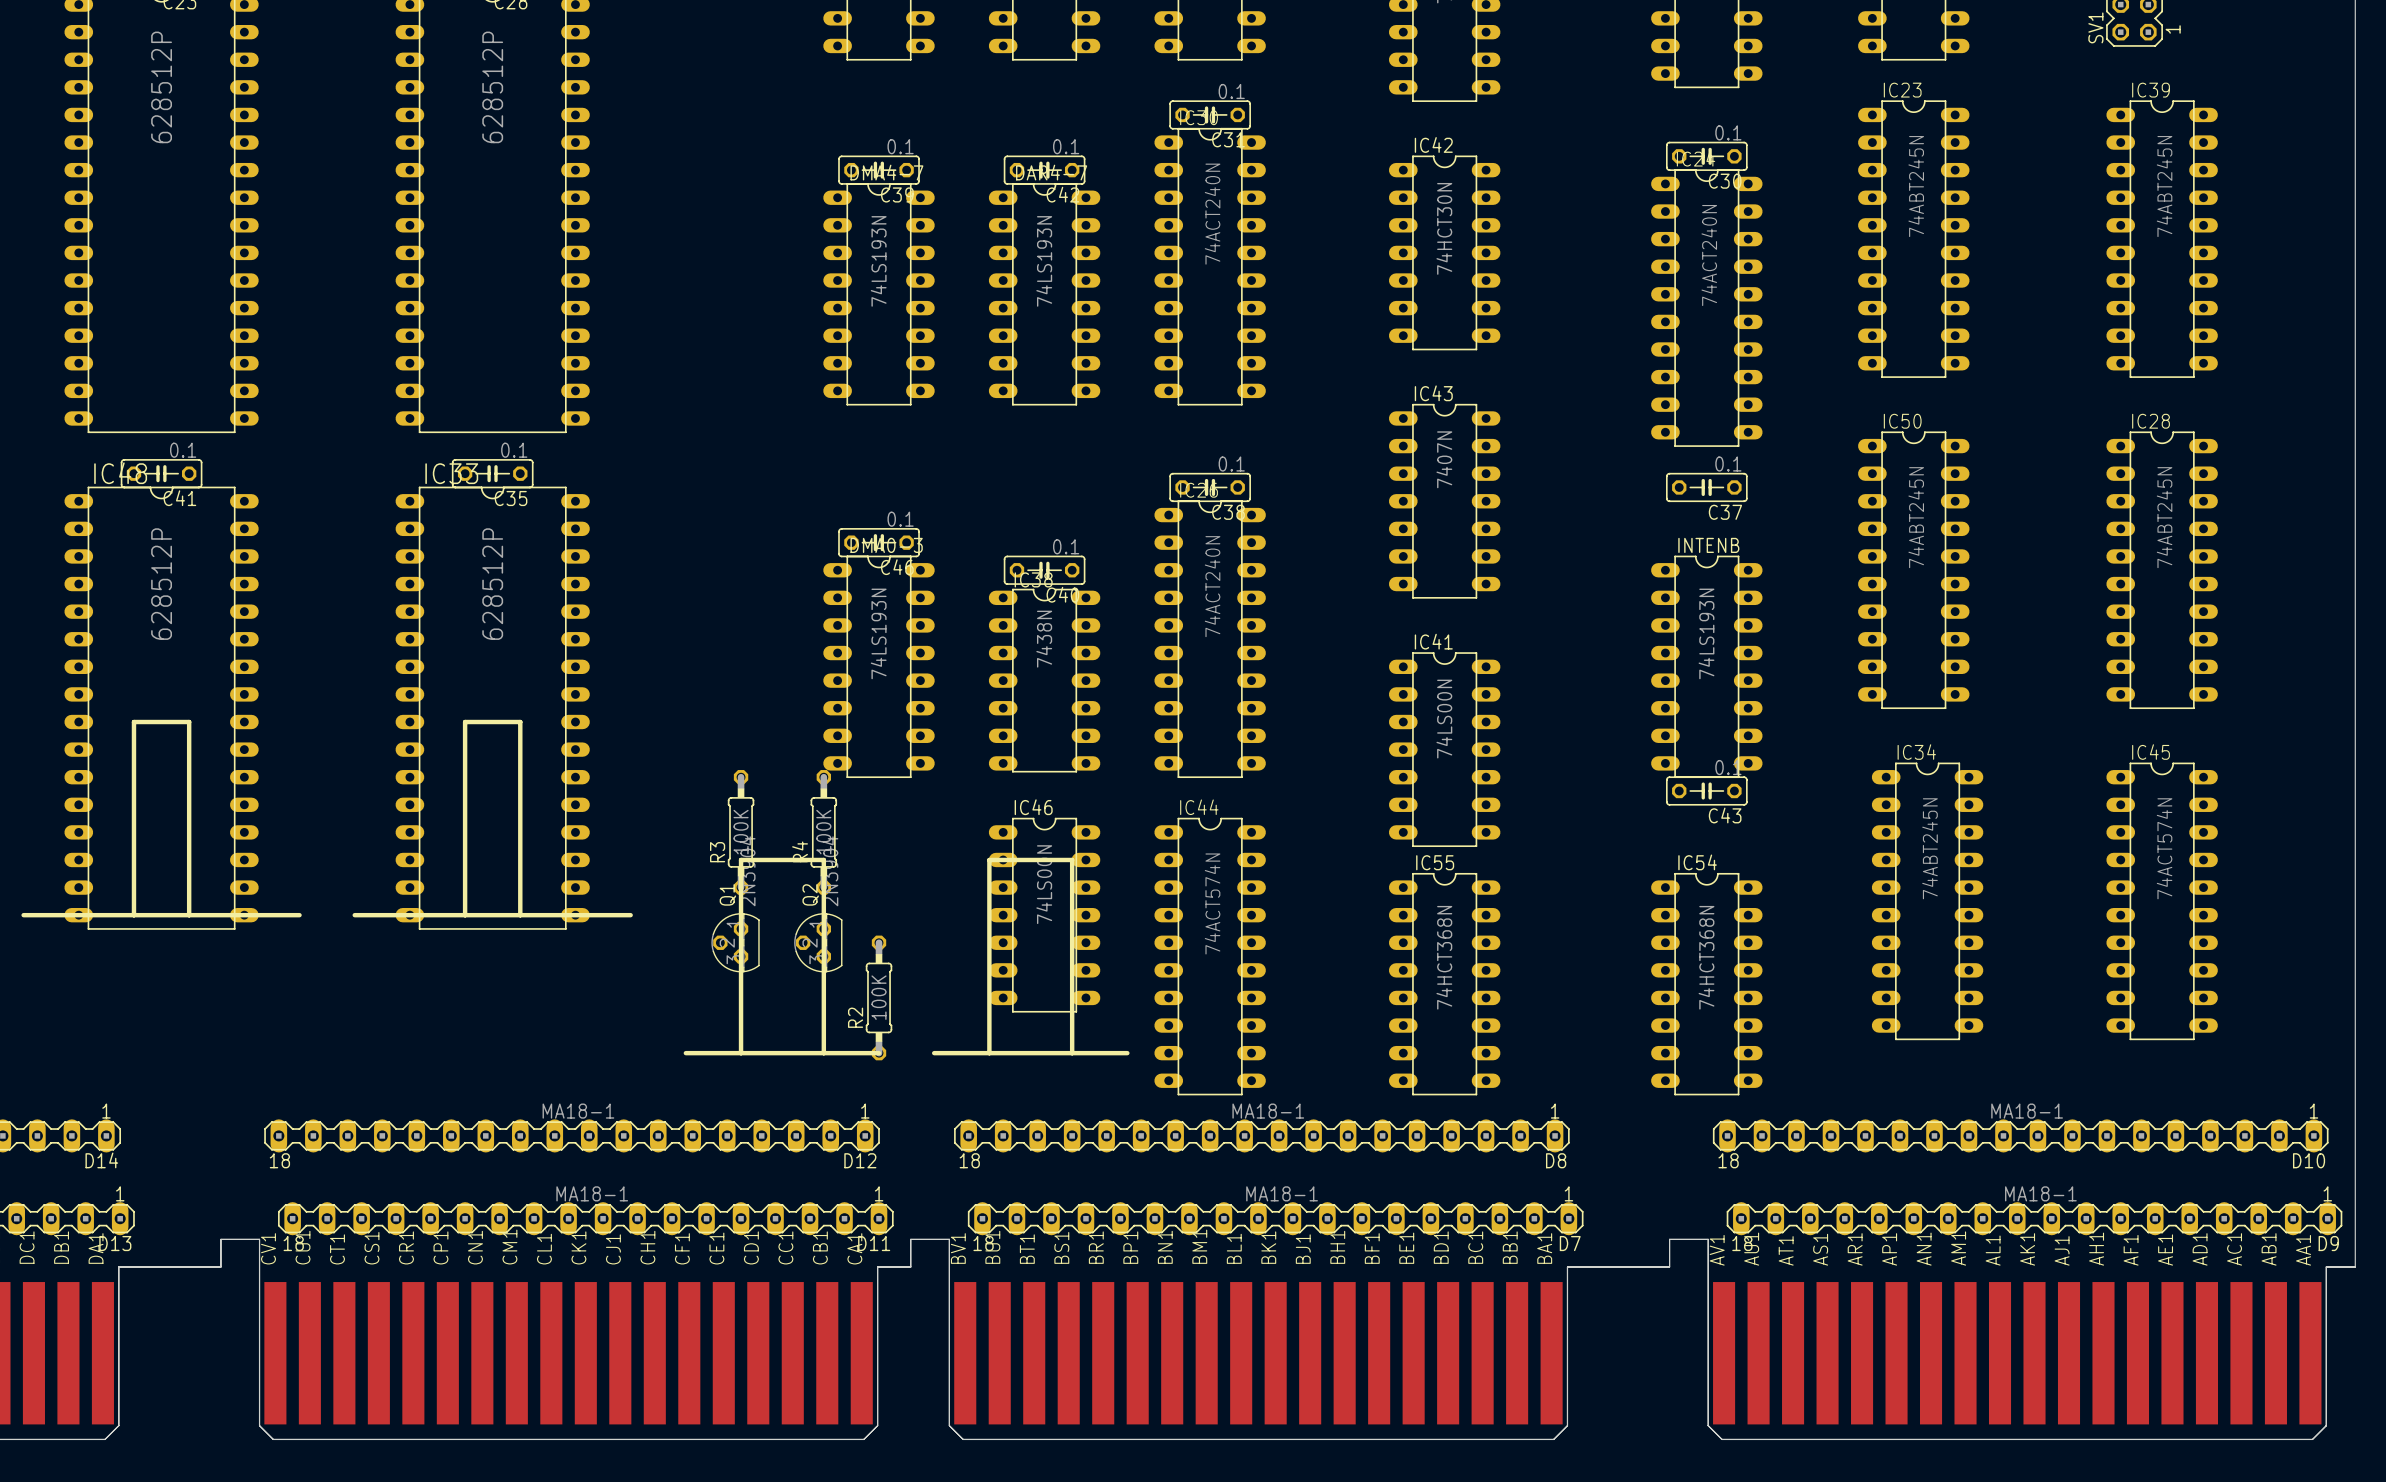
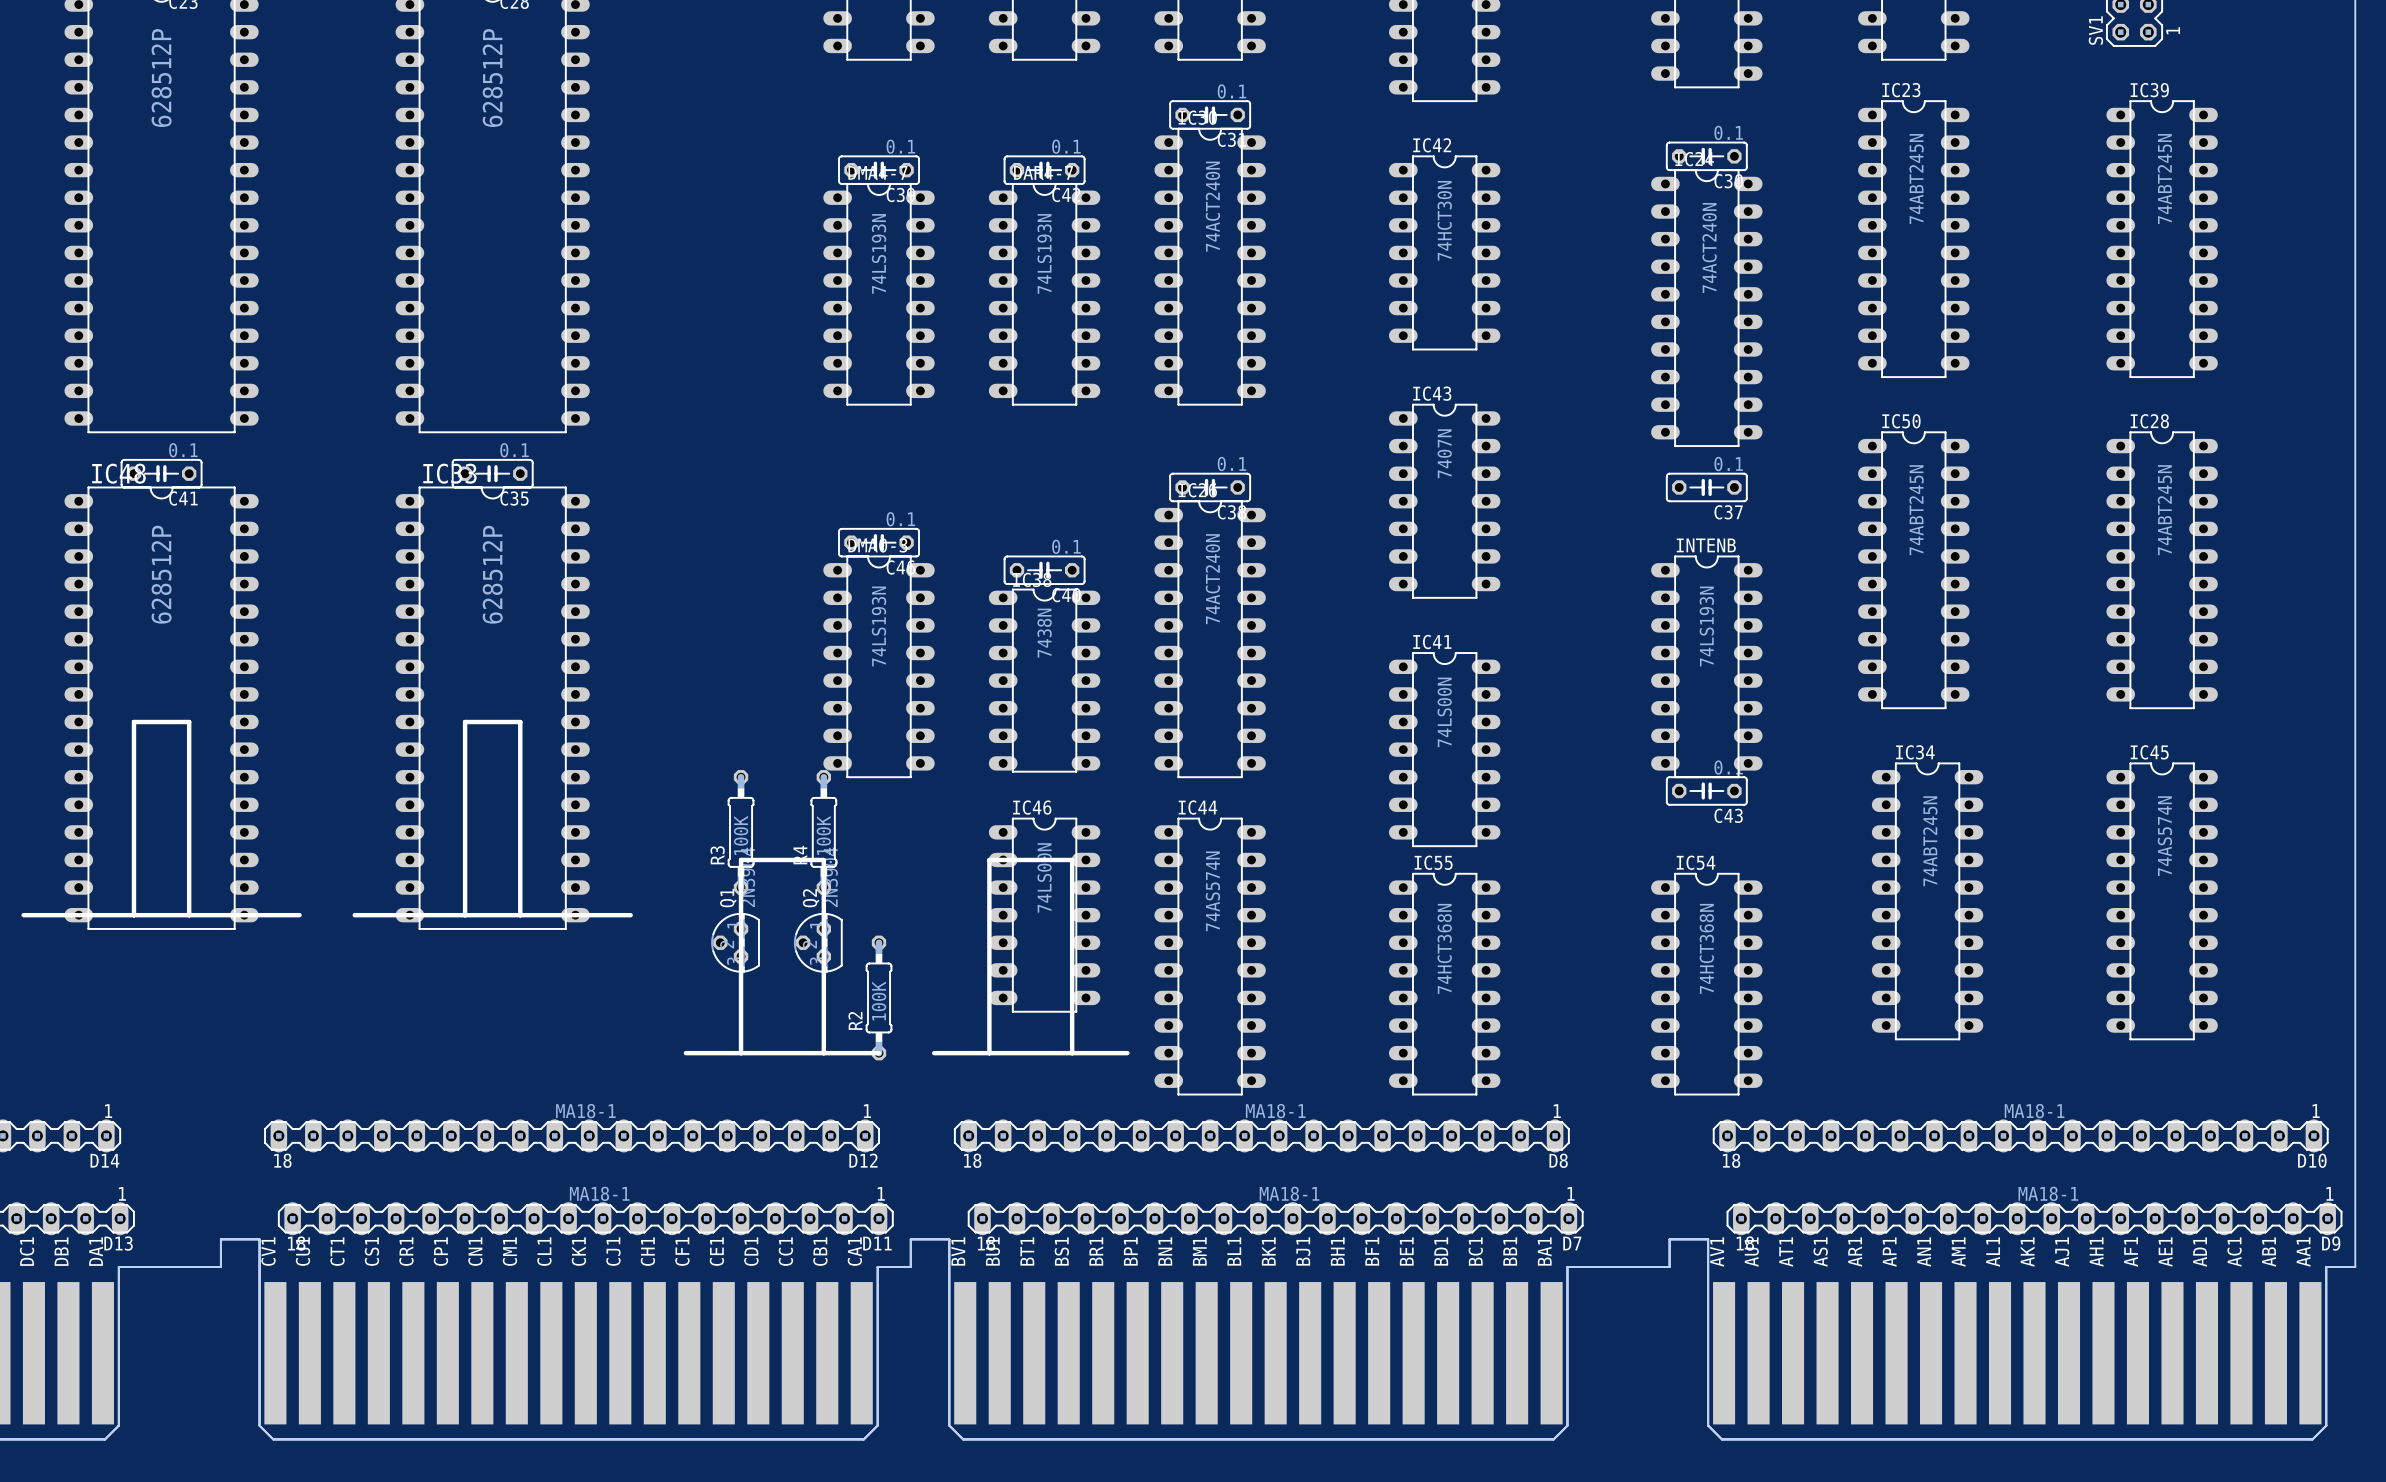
IC45 value: 74ACT574N (2164, 848) -> 74AS574N (2164, 836)
IC44 value: 74ACT574N (1212, 903) -> 74AS574N (1212, 891)

